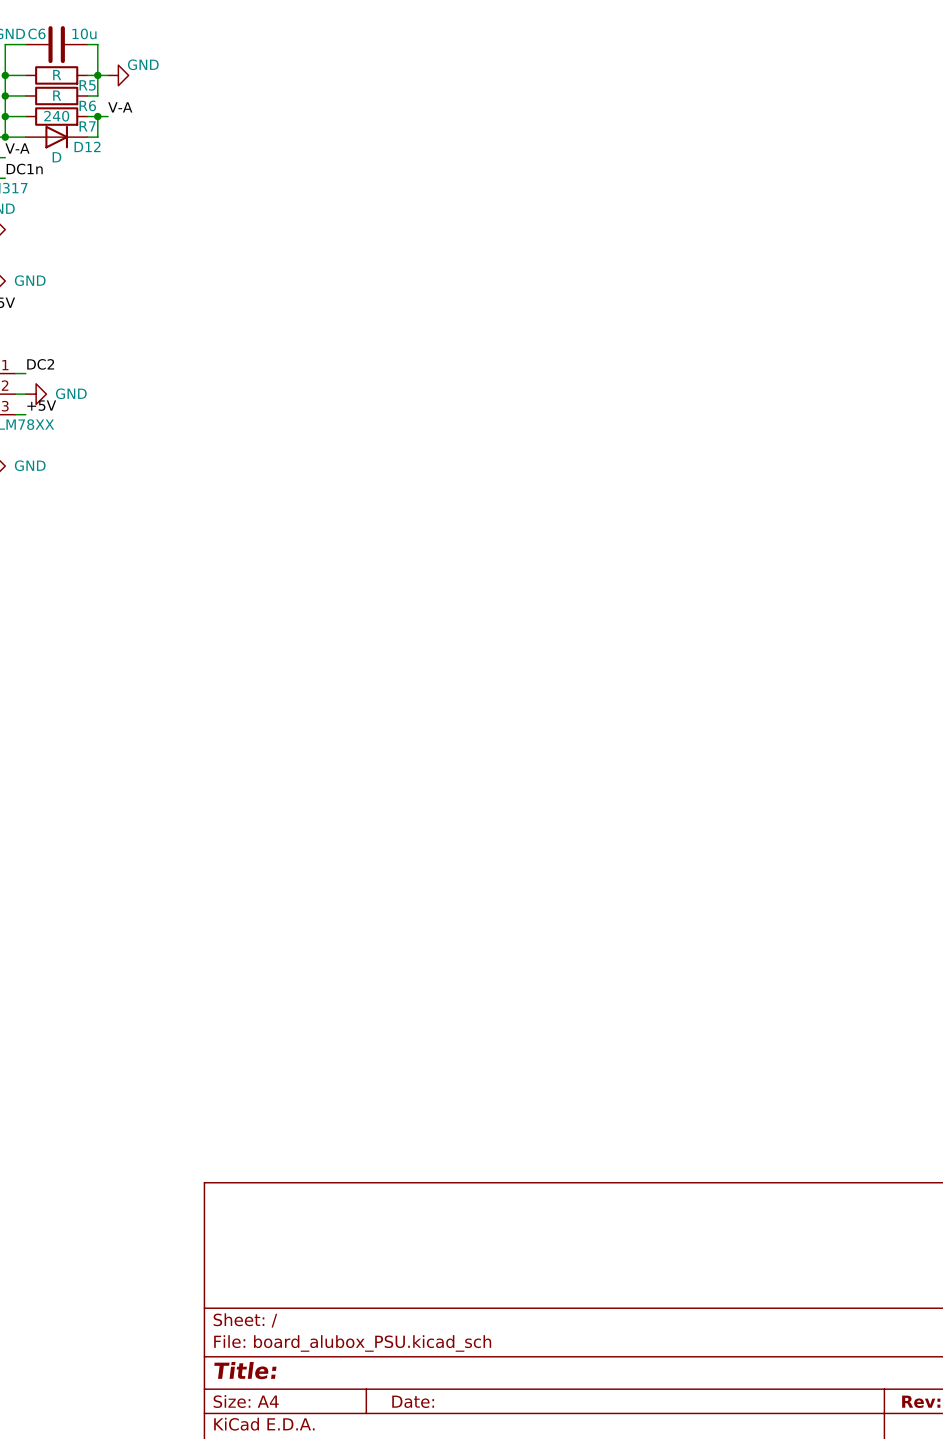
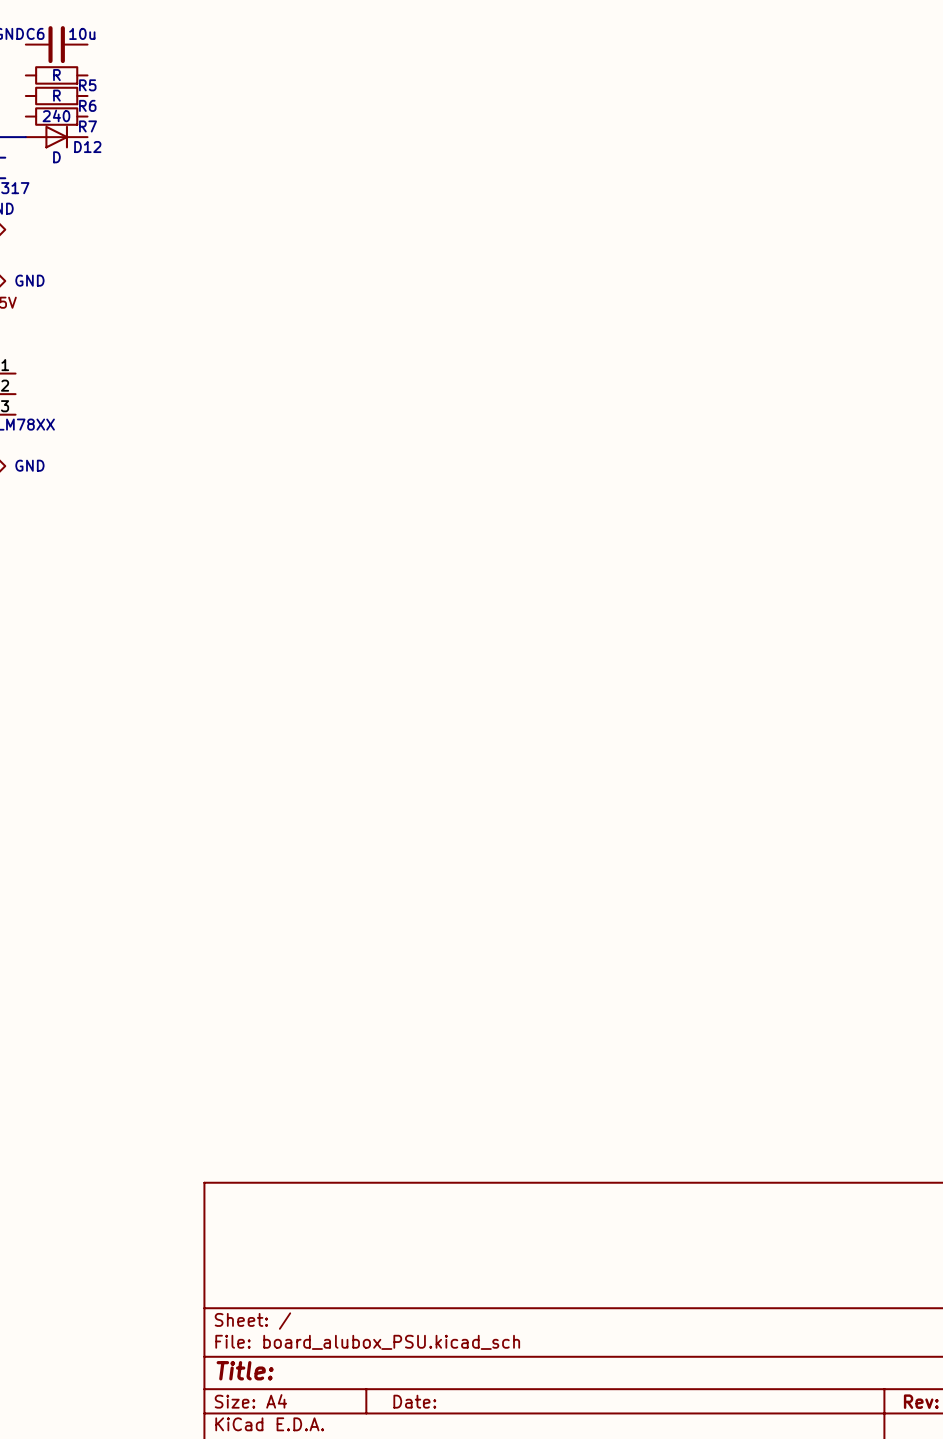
wire: (25, 44) (5, 44) (5, 137) -> none
wire: (87, 44) (97, 44) (97, 95) (87, 95) -> none
wire: (5, 75) (25, 75) -> none
junction: (5, 75) -> none
wire: (87, 75) (108, 75) -> none
junction: (97, 75) -> none
power symbol: GND (118, 75) -> none
wire: (5, 95) (25, 95) -> none
junction: (5, 95) -> none
label: V-A (120, 107) -> none
wire: (5, 116) (25, 116) -> none
junction: (5, 116) -> none
wire: (87, 116) (108, 116) -> none
wire: (97, 116) (97, 137) (87, 137) -> none
junction: (97, 116) -> none
junction: (5, 137) -> none
label: V-A (17, 148) -> none
label: DC1n (24, 169) -> none
label: DC2 (40, 364) -> none
wire: (15, 373) (25, 373) -> none
wire: (15, 394) (25, 394) -> none
power symbol: GND (36, 394) -> none
label: +5V (41, 405) -> none
wire: (15, 414) (25, 414) -> none

